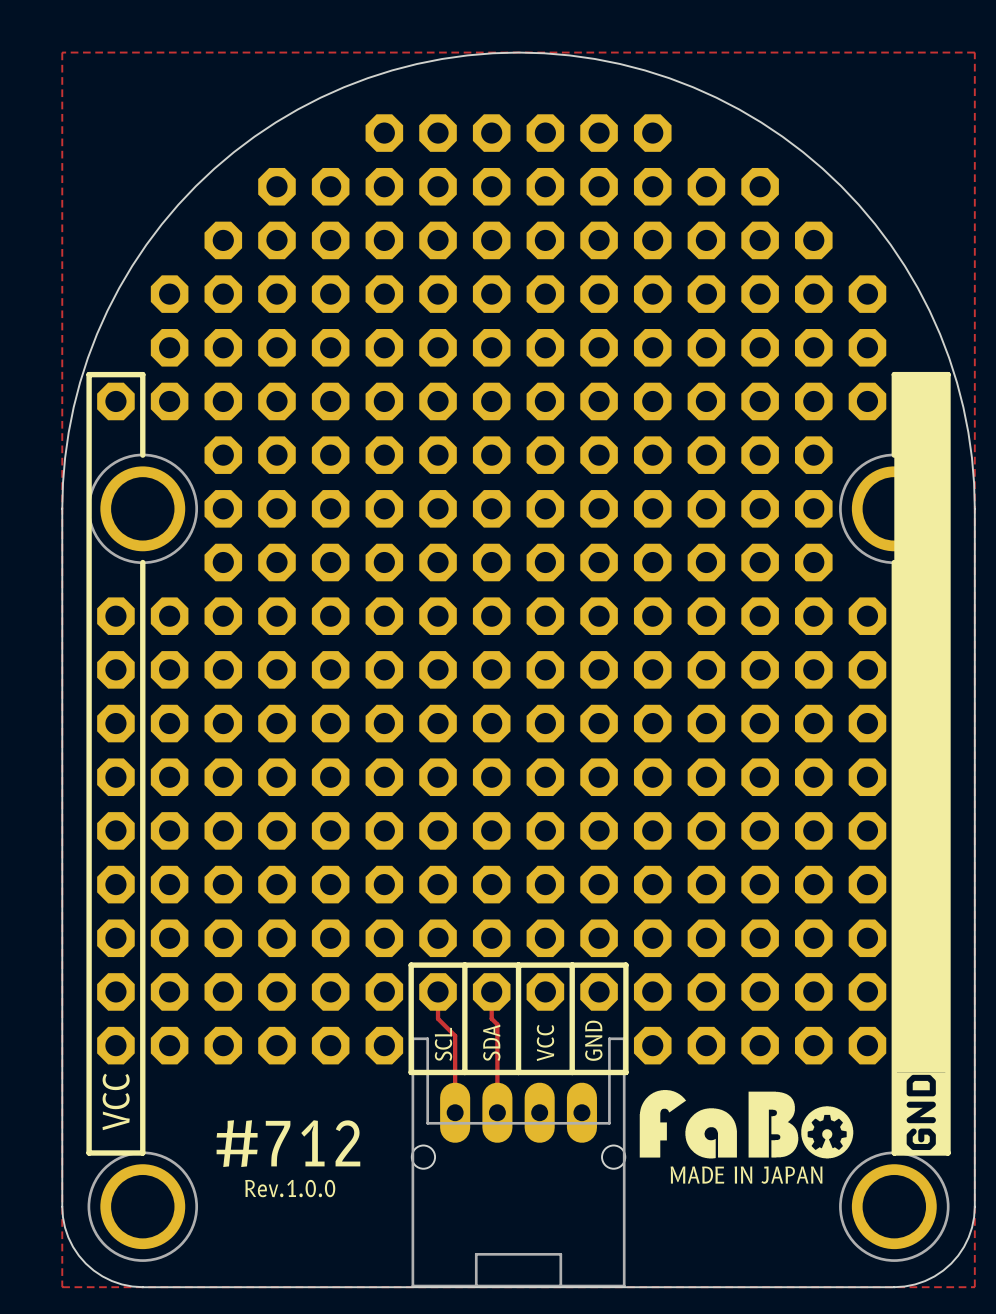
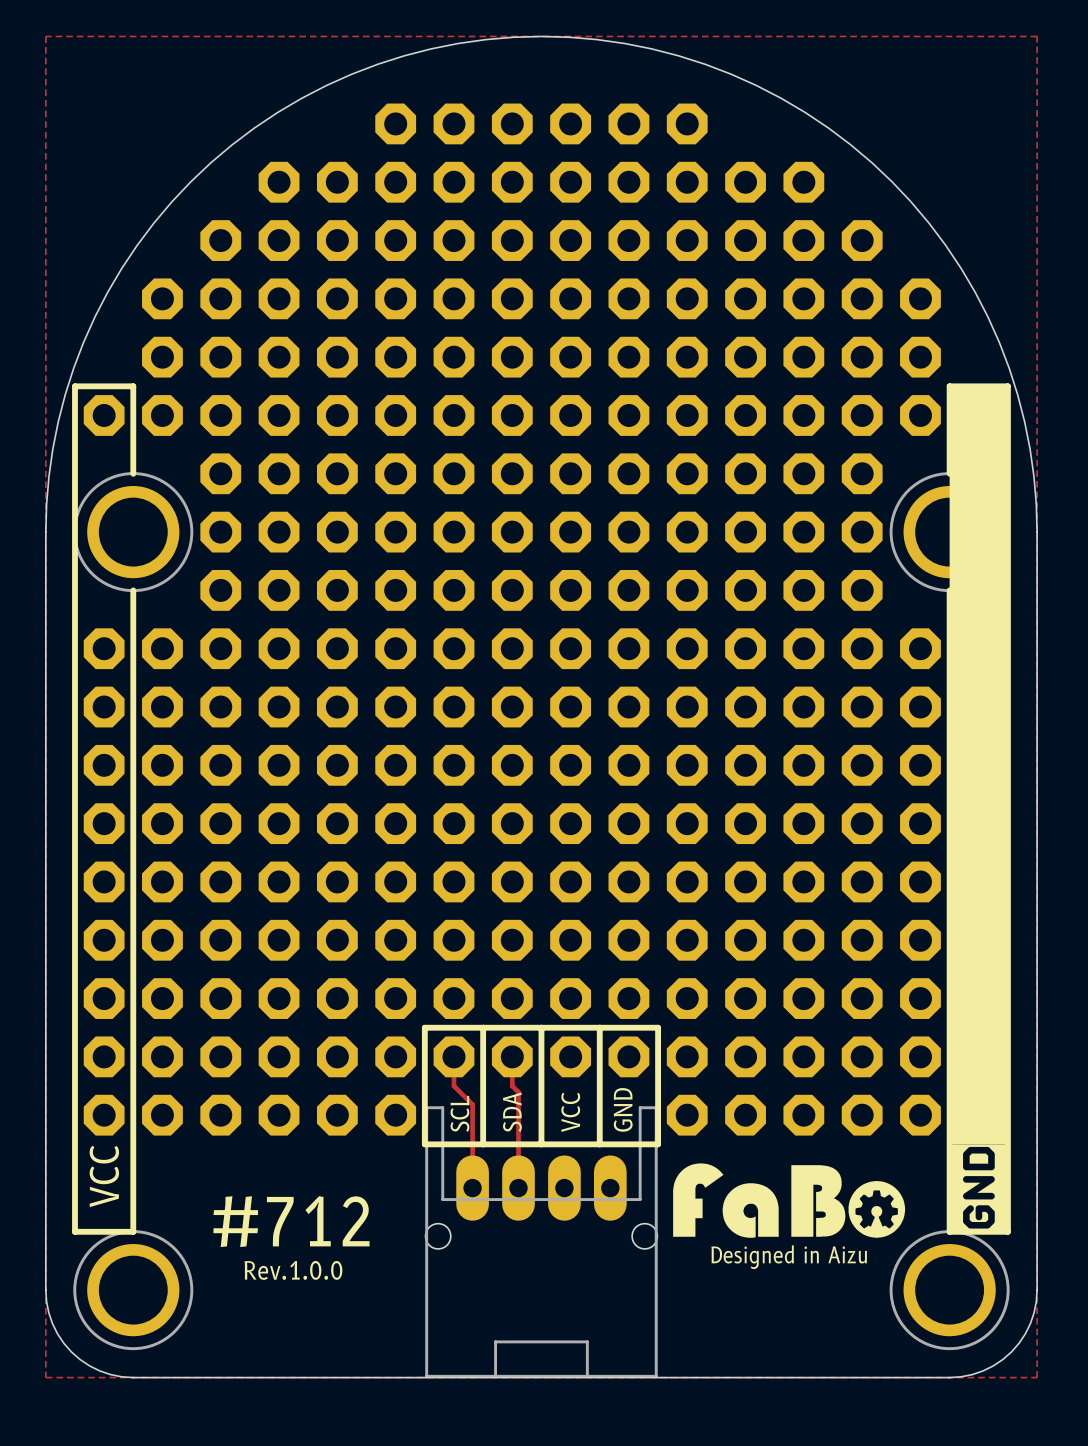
text: MADE IN JAPAN (746, 1175) -> Designed in Aizu (789, 1257)

